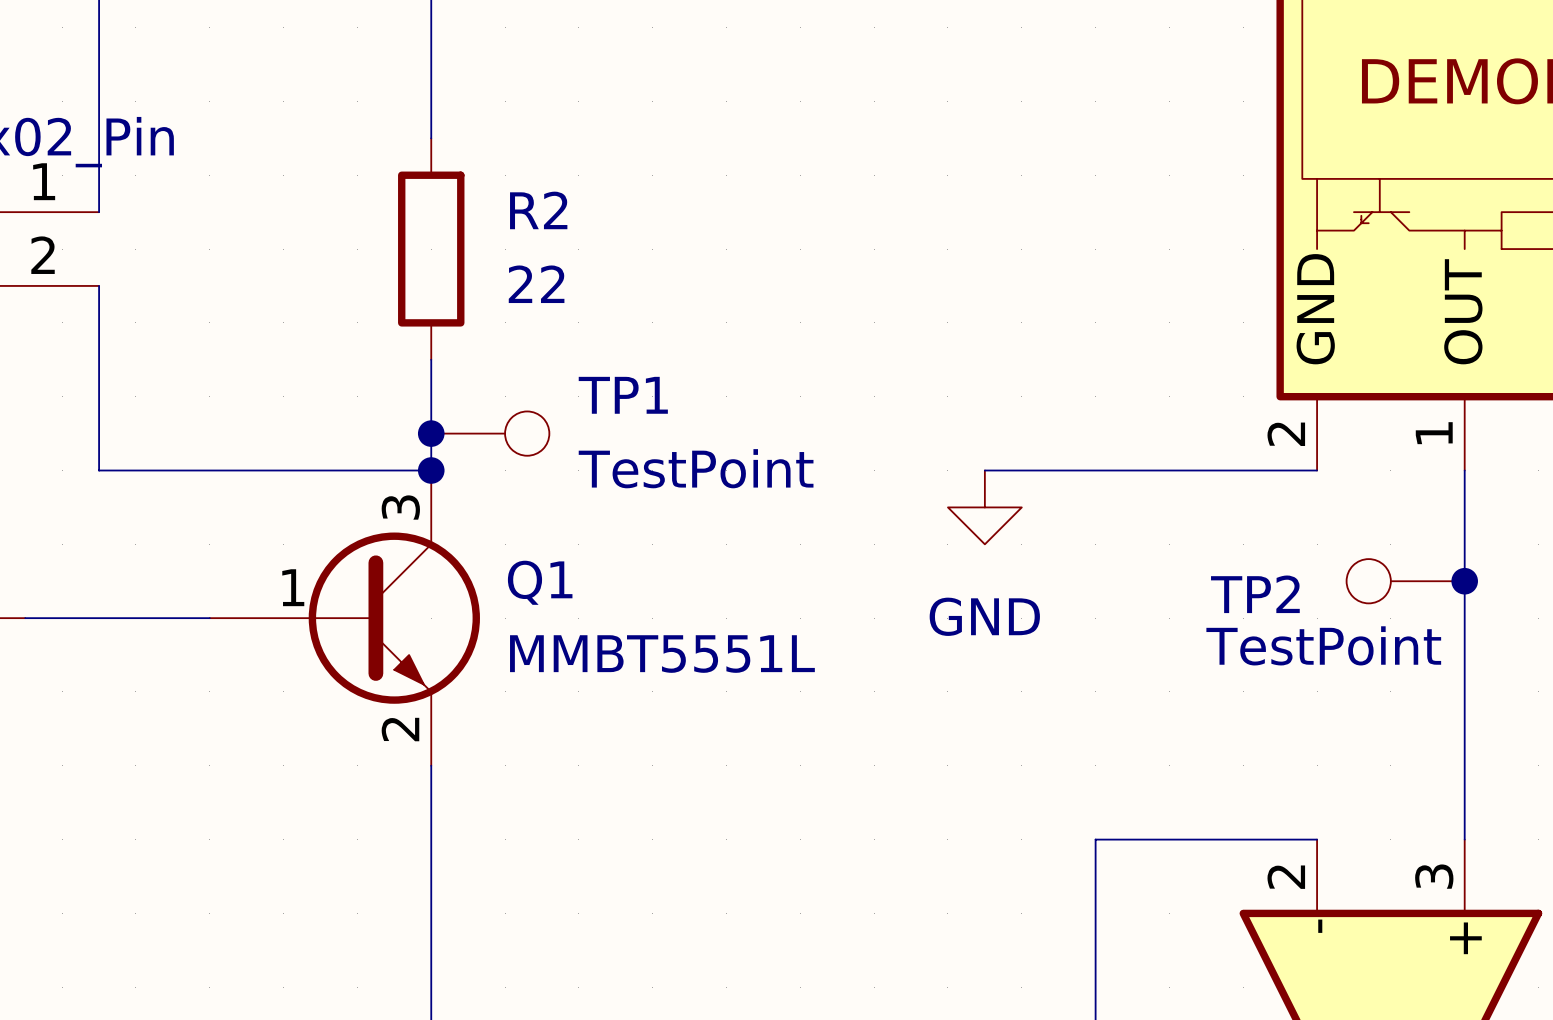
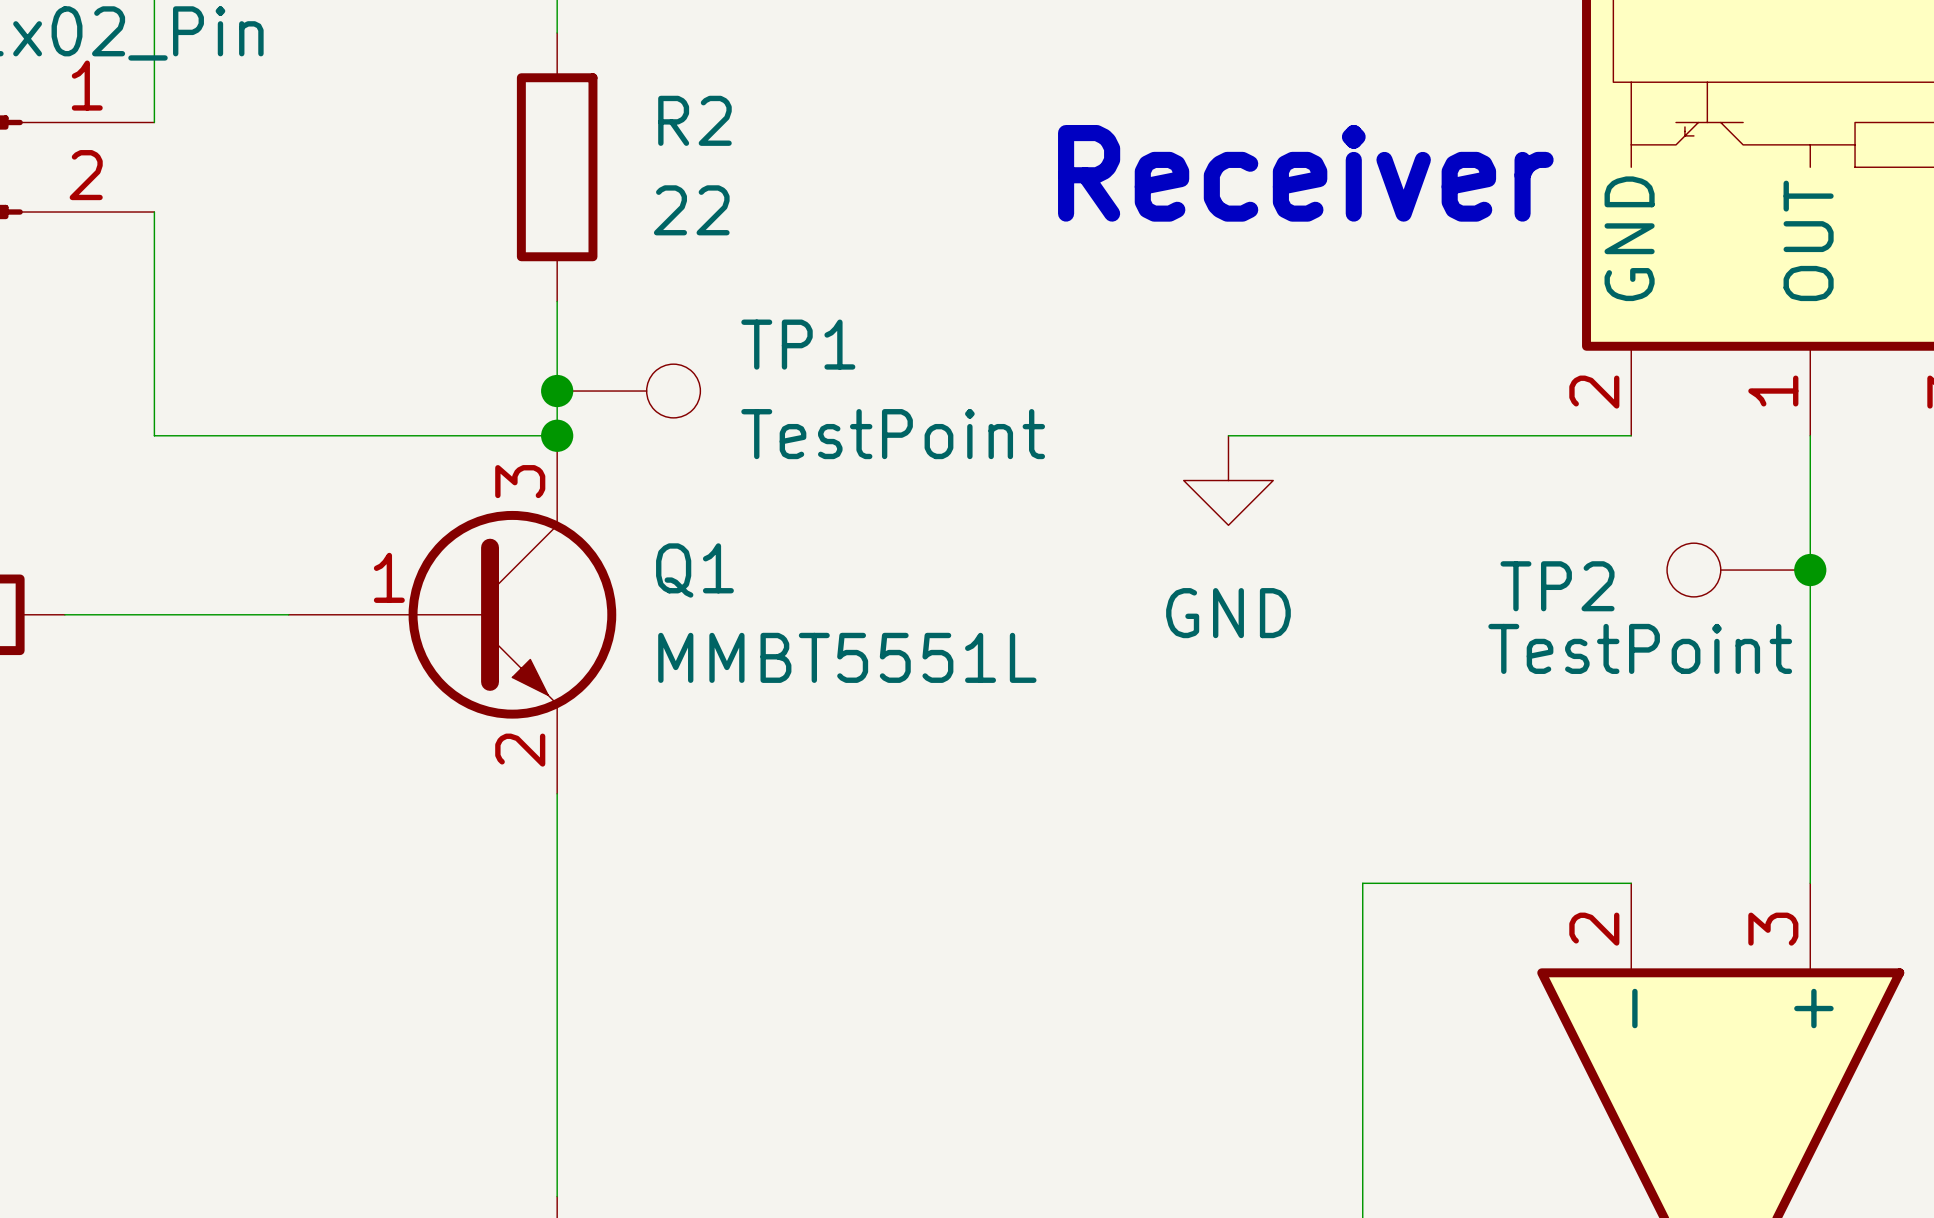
text: none -> Receiver (1305, 173)

